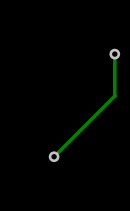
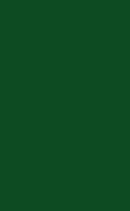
track: (114, 54) (114, 96) (54, 156) -> none
via: (114, 54) -> none
via: (54, 156) -> none

